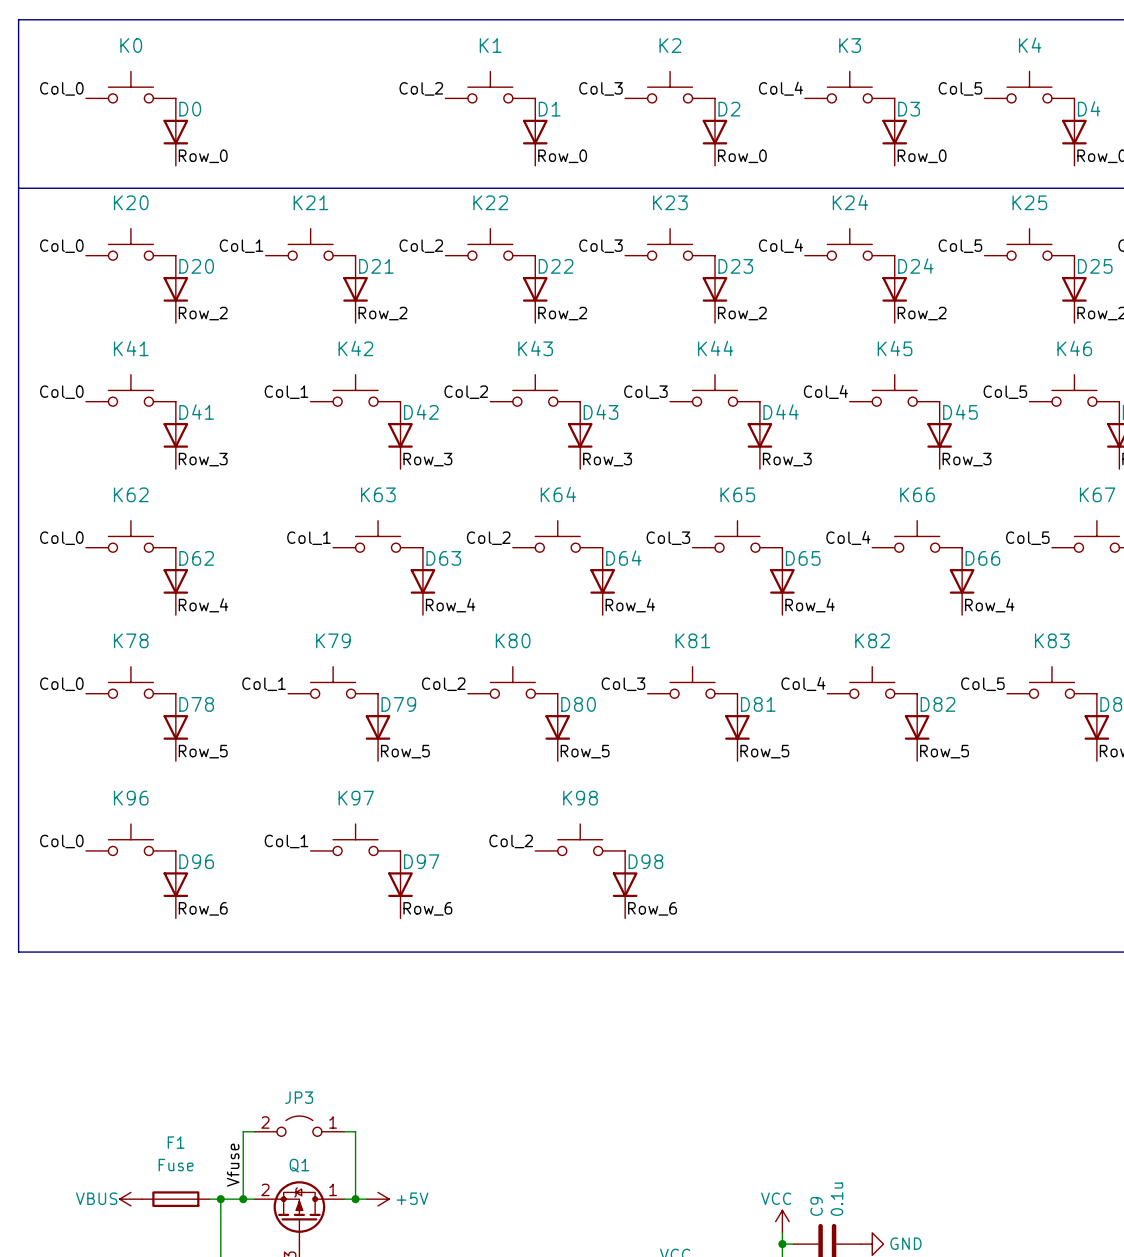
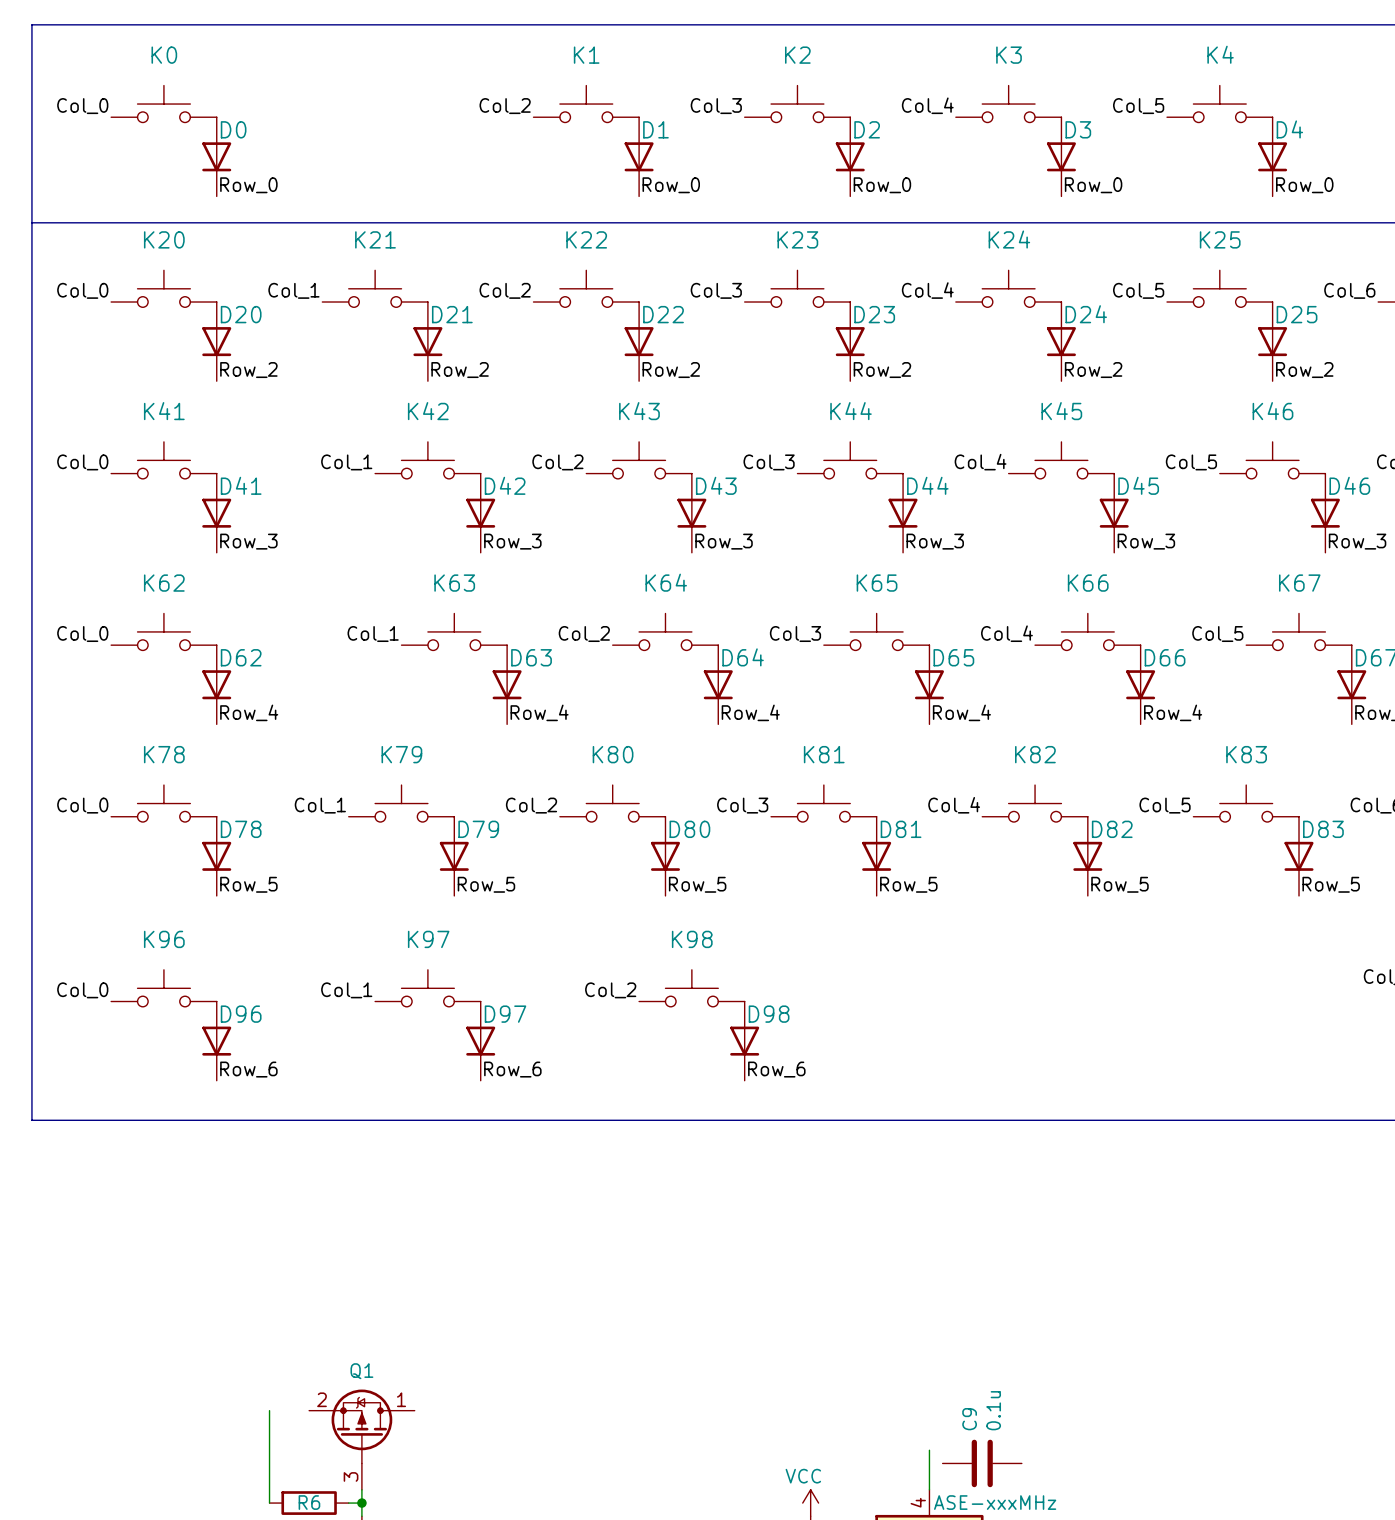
JP3: (299, 1126) -> none
wire: (254, 1131) (243, 1131) (243, 1199) -> none
wire: (344, 1131) (355, 1131) (355, 1199) -> none
label: Vfuse (233, 1165) -> none
power symbol: VBUS (130, 1199) -> none
F1: Fuse (175, 1199) -> none
wire: (209, 1199) (254, 1199) -> none
junction: (220, 1199) -> none
junction: (243, 1199) -> none
wire: (344, 1199) (366, 1199) -> none
junction: (355, 1199) -> none
power symbol: +5V (378, 1199) -> none
power symbol: VCC (782, 1221) -> none
wire: (782, 1244) (793, 1244) -> none
junction: (782, 1244) -> none
power symbol: GND (872, 1244) -> none

